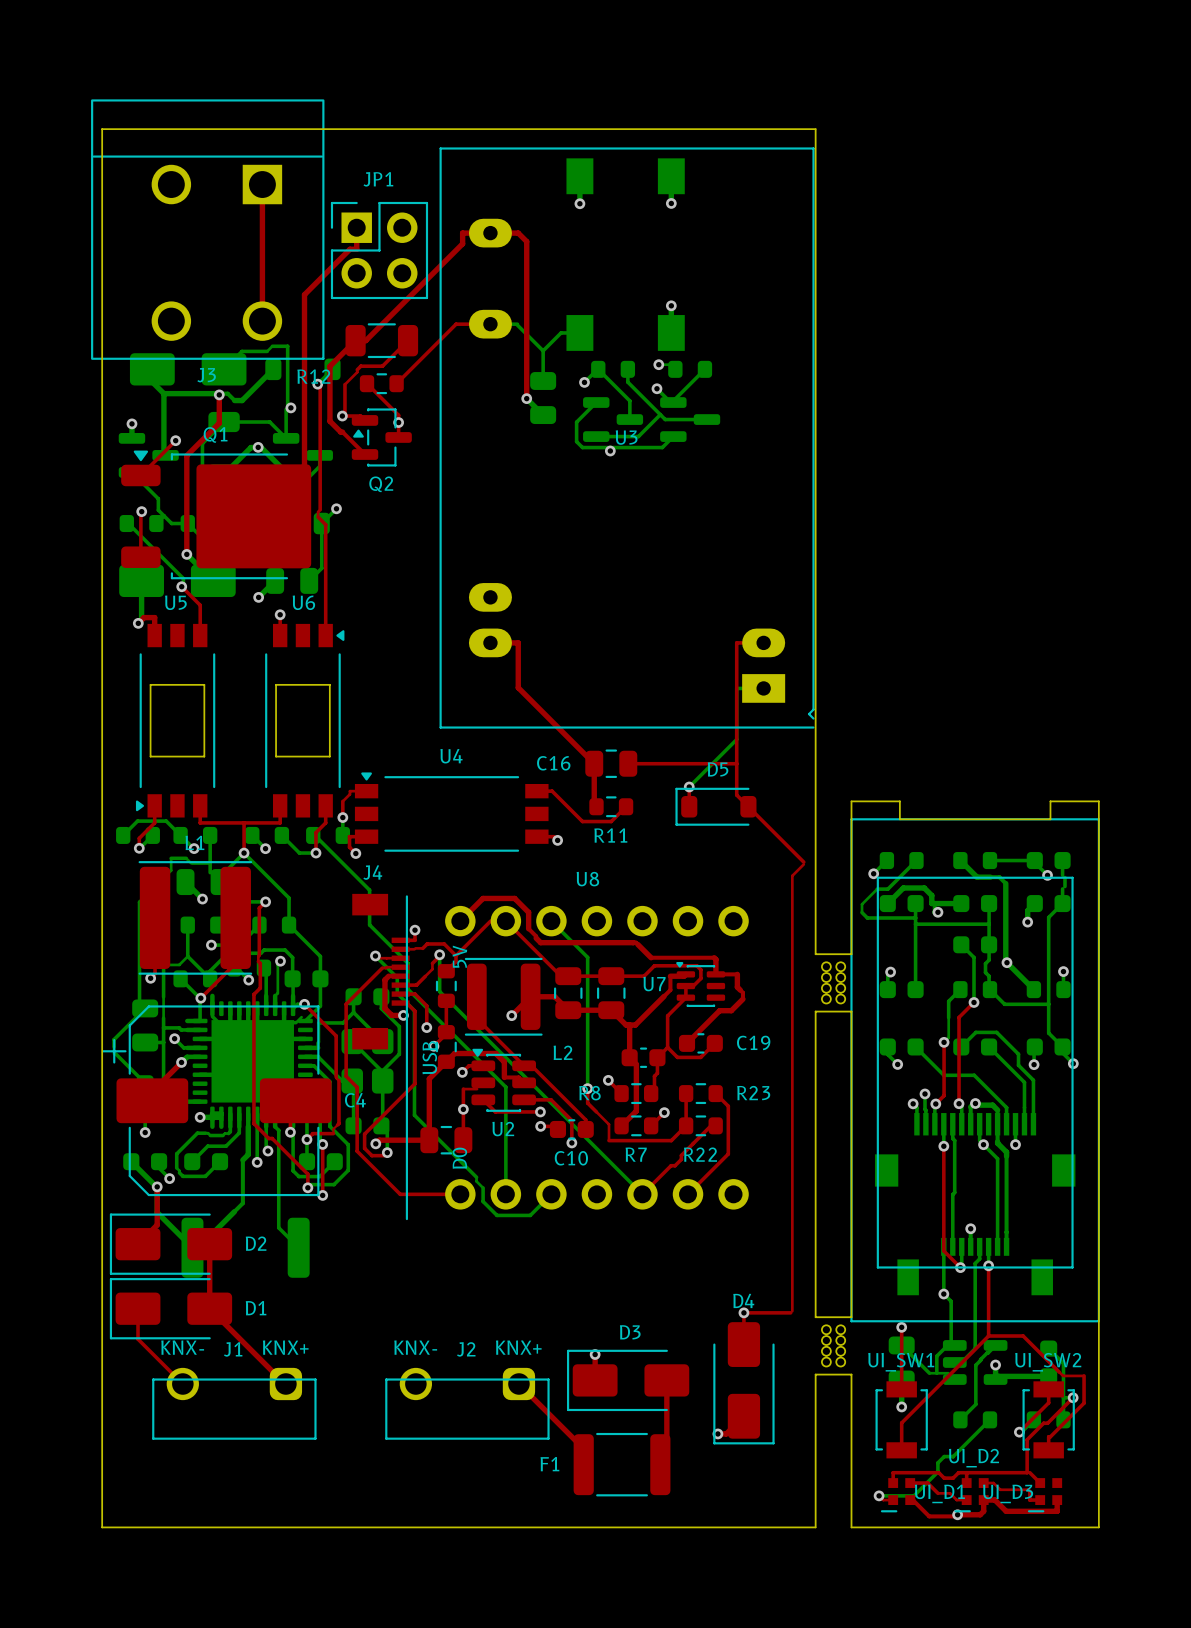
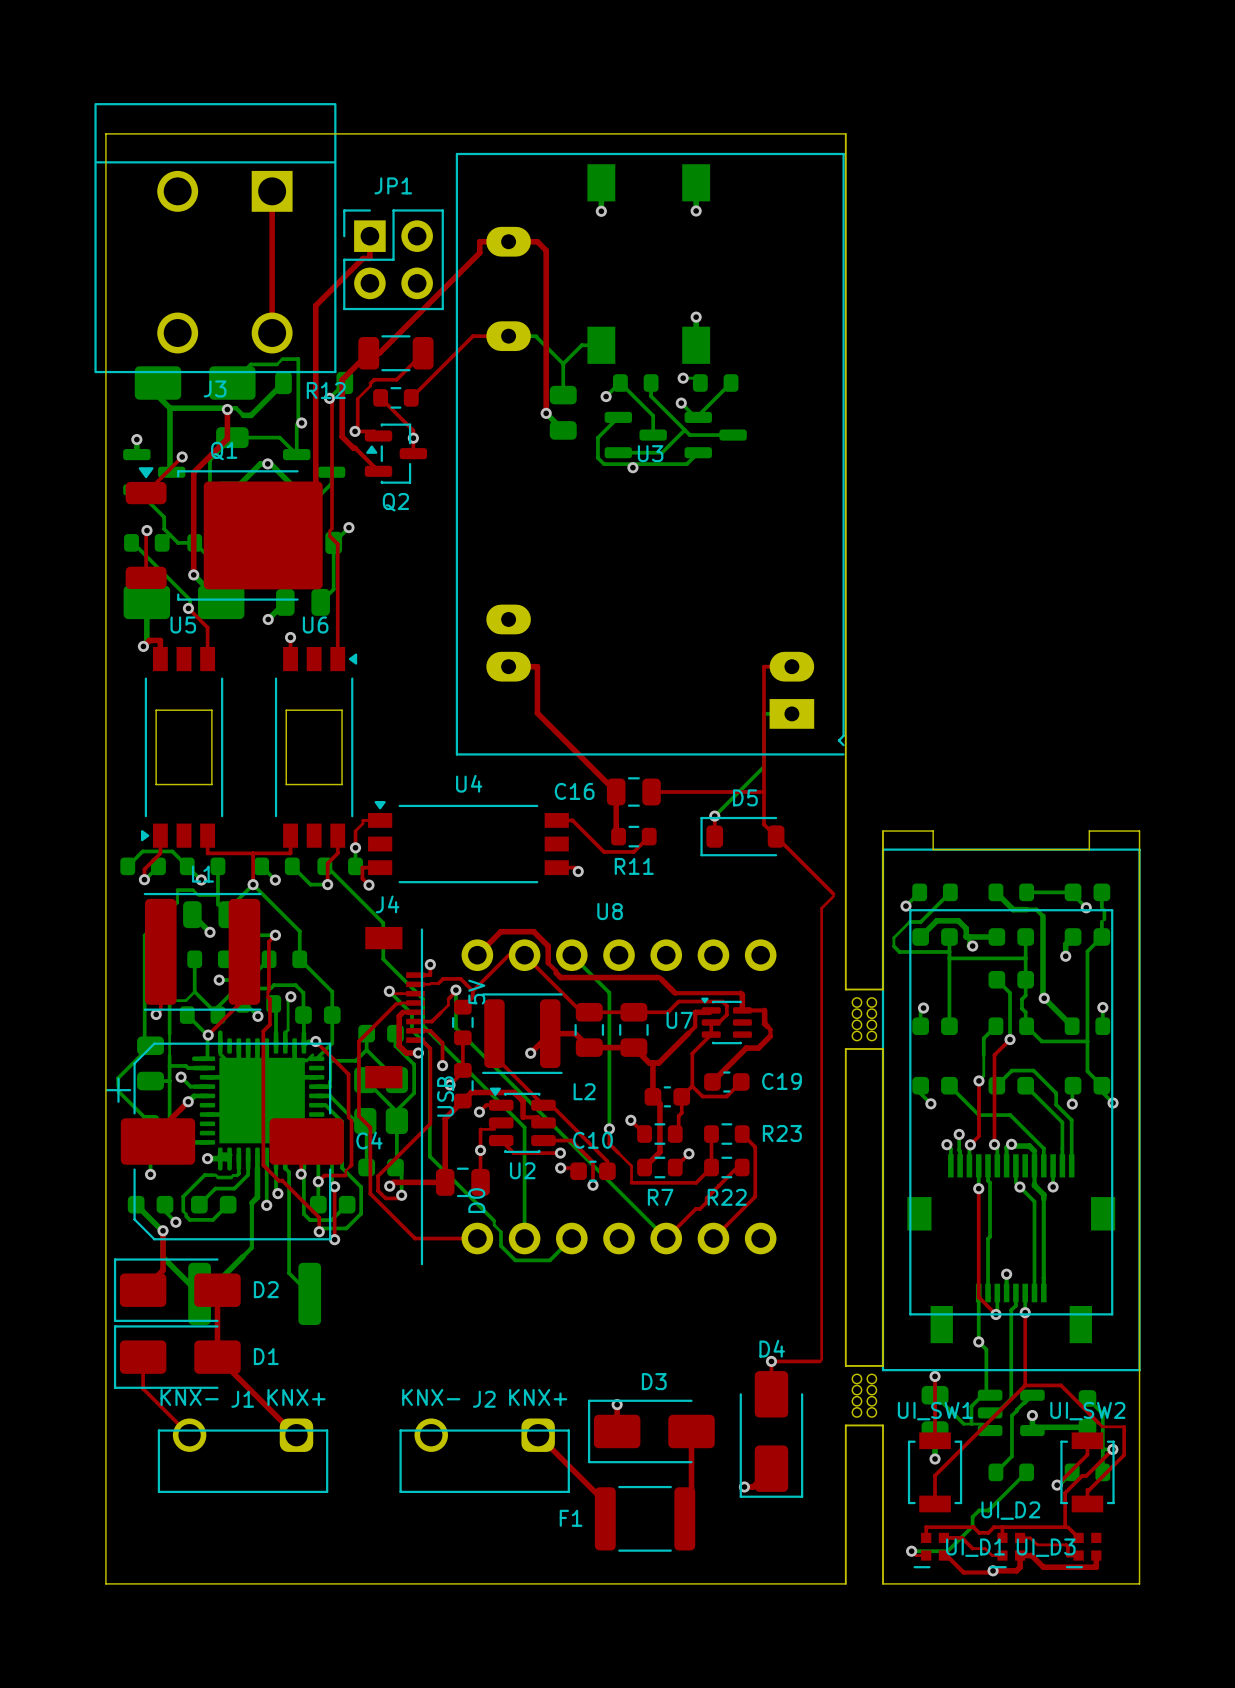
R8 name: R8 (589, 1093) -> none
C10 name position: C10 (571, 1158) -> C10 (592, 1140)

